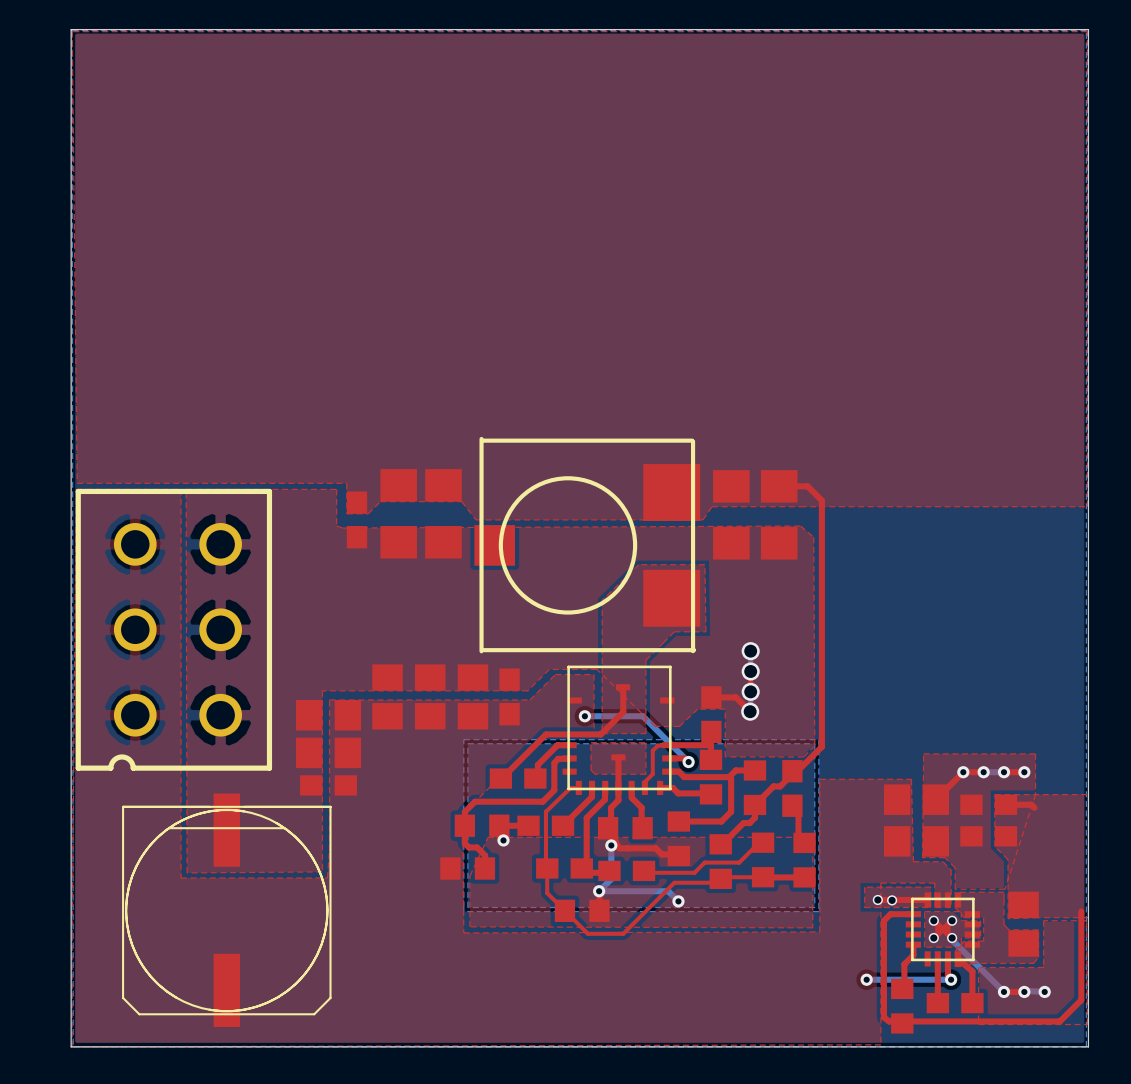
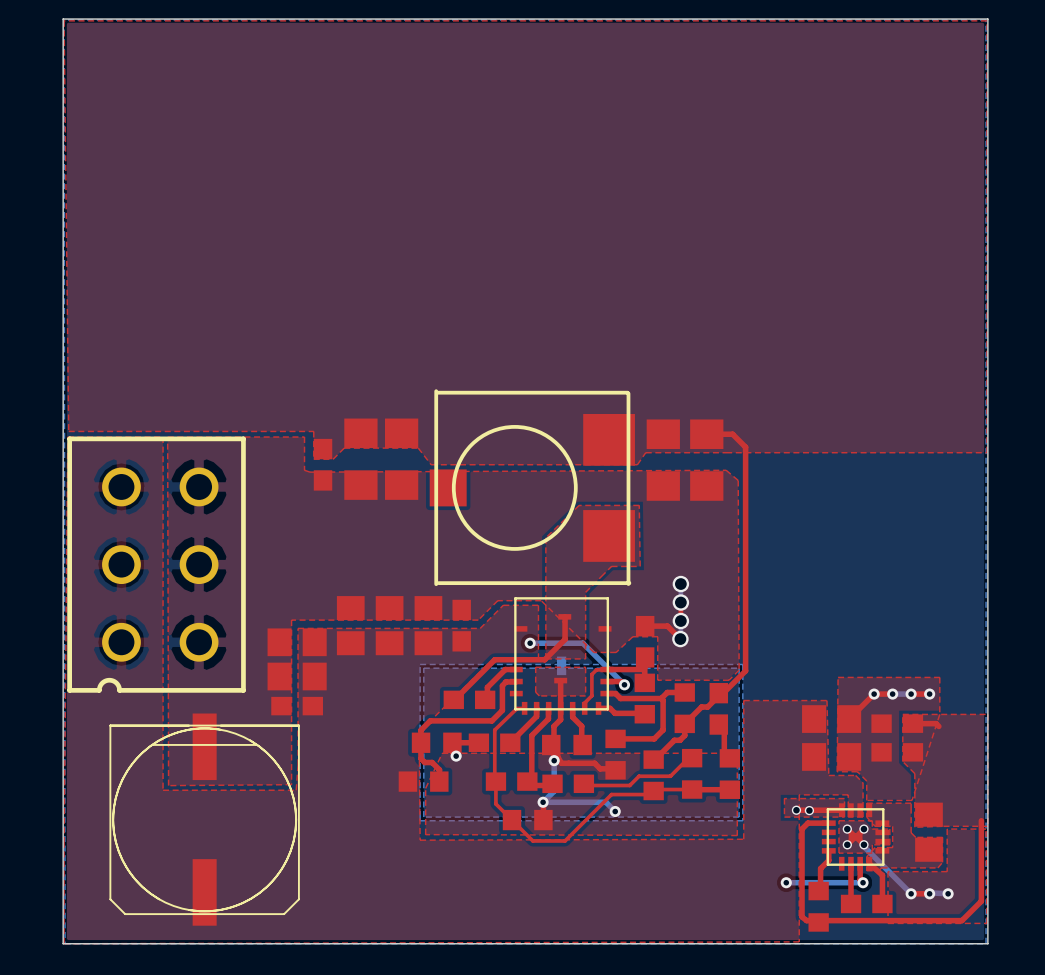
part: none -> (561, 665)

